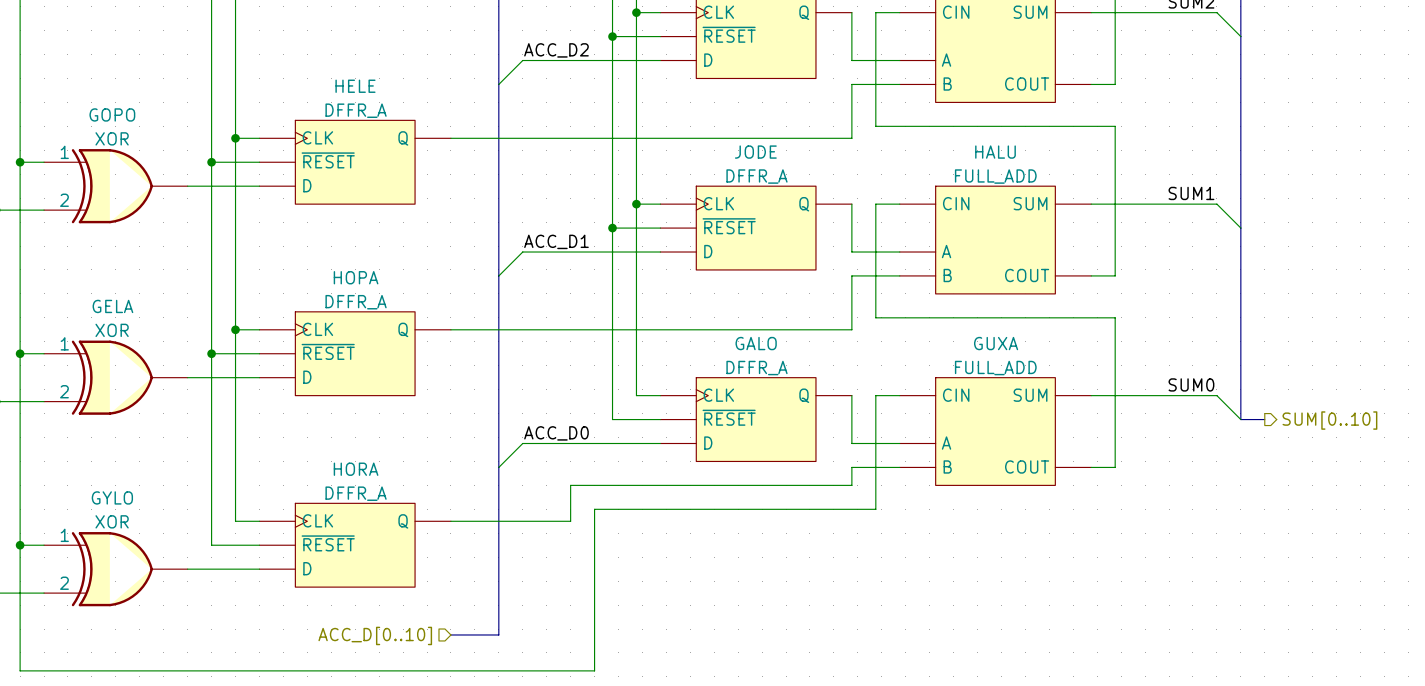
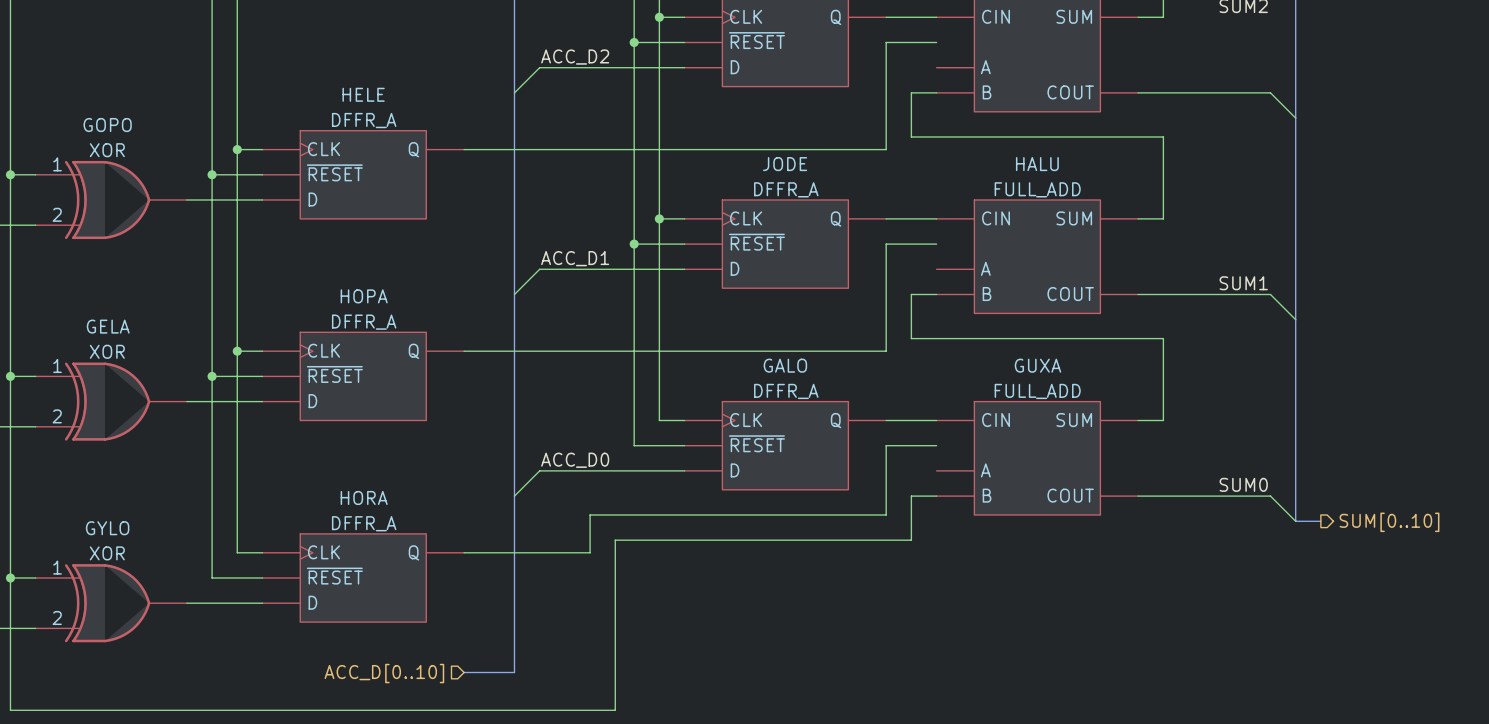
wire: (851, 12) (851, 36) -> (886, 17) (911, 17)
wire: (875, 12) (875, 84) (851, 84) -> none
wire: none -> (886, 42) (936, 42)
wire: (1240, 36) (1216, 12) (1115, 12) (1115, 84) -> (1295, 118) (1270, 92) (1163, 92)
wire: (851, 60) (899, 60) -> (886, 67) (886, 92)
label position: SUM1 (1191, 193) -> SUM1 (1243, 283)
wire: (851, 204) (851, 228) -> (886, 218) (911, 218)
wire: (875, 204) (875, 275) (851, 275) -> none
wire: none -> (886, 244) (936, 244)
wire: (1240, 228) (1216, 204) (1115, 204) (1115, 275) -> (1295, 319) (1270, 294) (1163, 294)
wire: (851, 252) (899, 252) -> (886, 269) (886, 294)
label position: SUM0 (1191, 384) -> SUM0 (1243, 484)
wire: (851, 395) (851, 419) -> (886, 420) (911, 420)
wire: (875, 395) (875, 467) (851, 467) -> (886, 470) (886, 496)
wire: (1240, 419) (1216, 395) (1115, 395) (1115, 467) -> (1295, 521) (1270, 496) (1163, 496)
bus: (1240, 419) (1264, 419) -> (1295, 445) (1295, 521) (1320, 521)
hierarchical label position: SUM[0..10] (1329, 420) -> SUM[0..10] (1389, 522)
wire: (851, 443) (899, 443) -> (886, 445) (936, 445)

